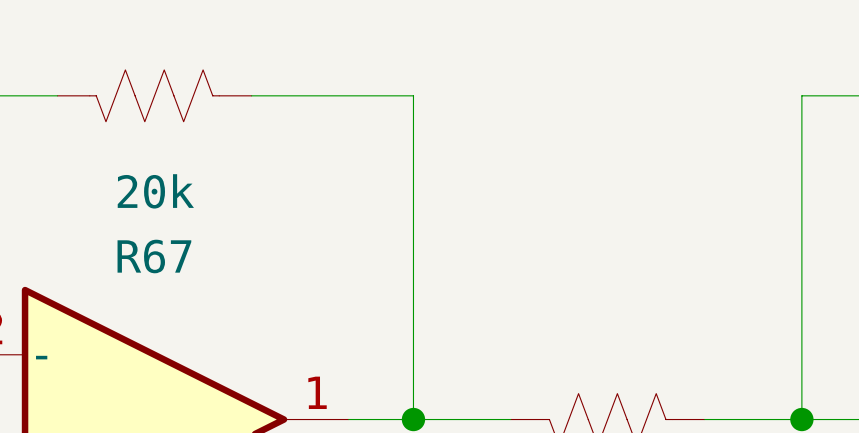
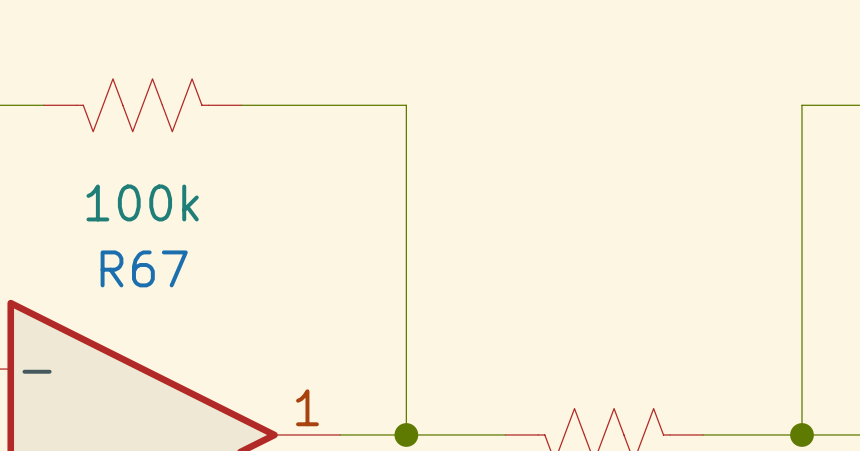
R67 value: 20k (155, 191) -> 100k (142, 202)

